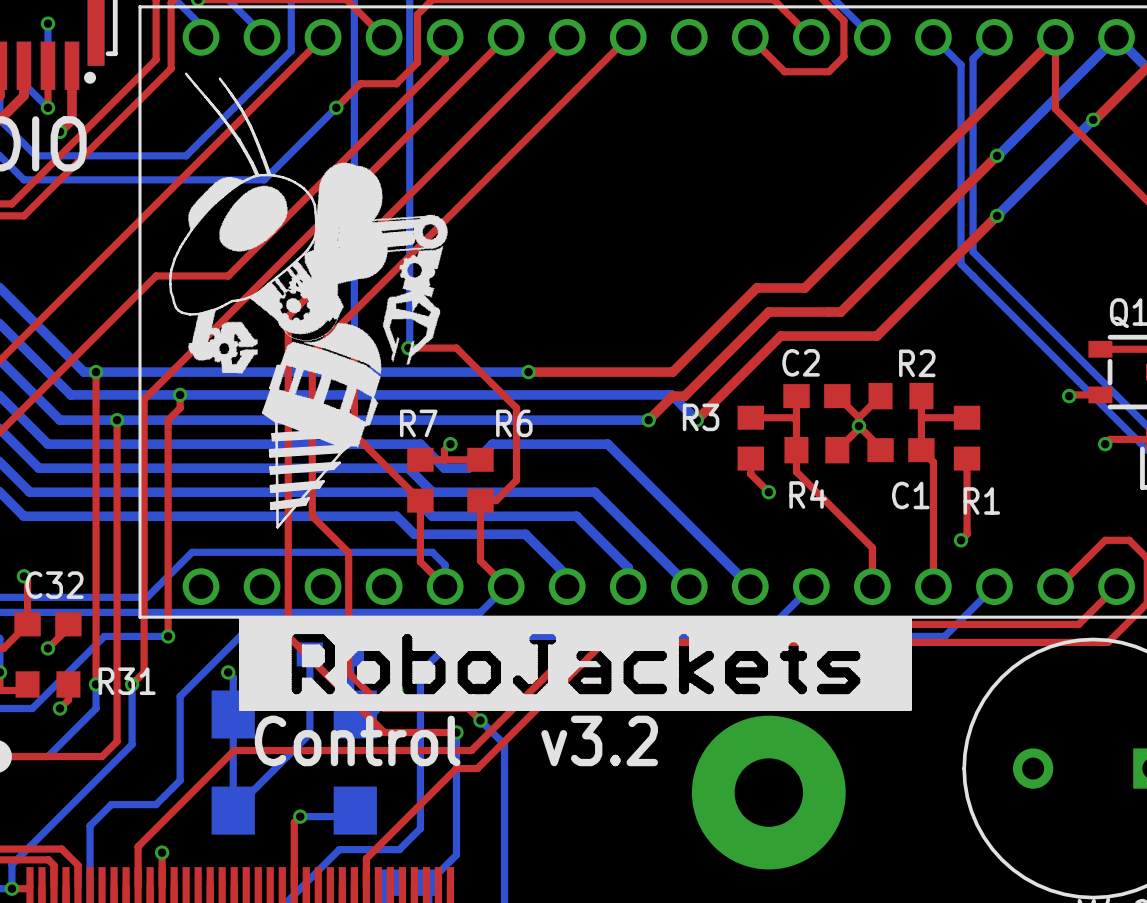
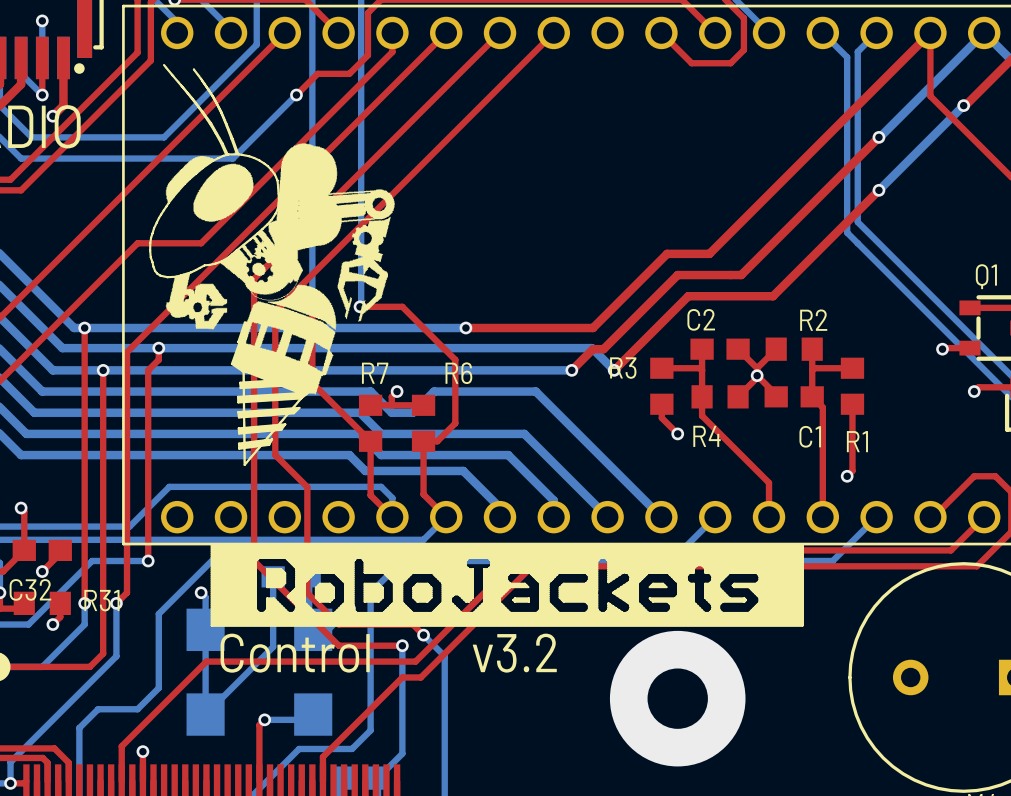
C32 name position: C32 (54, 585) -> C32 (30, 589)

